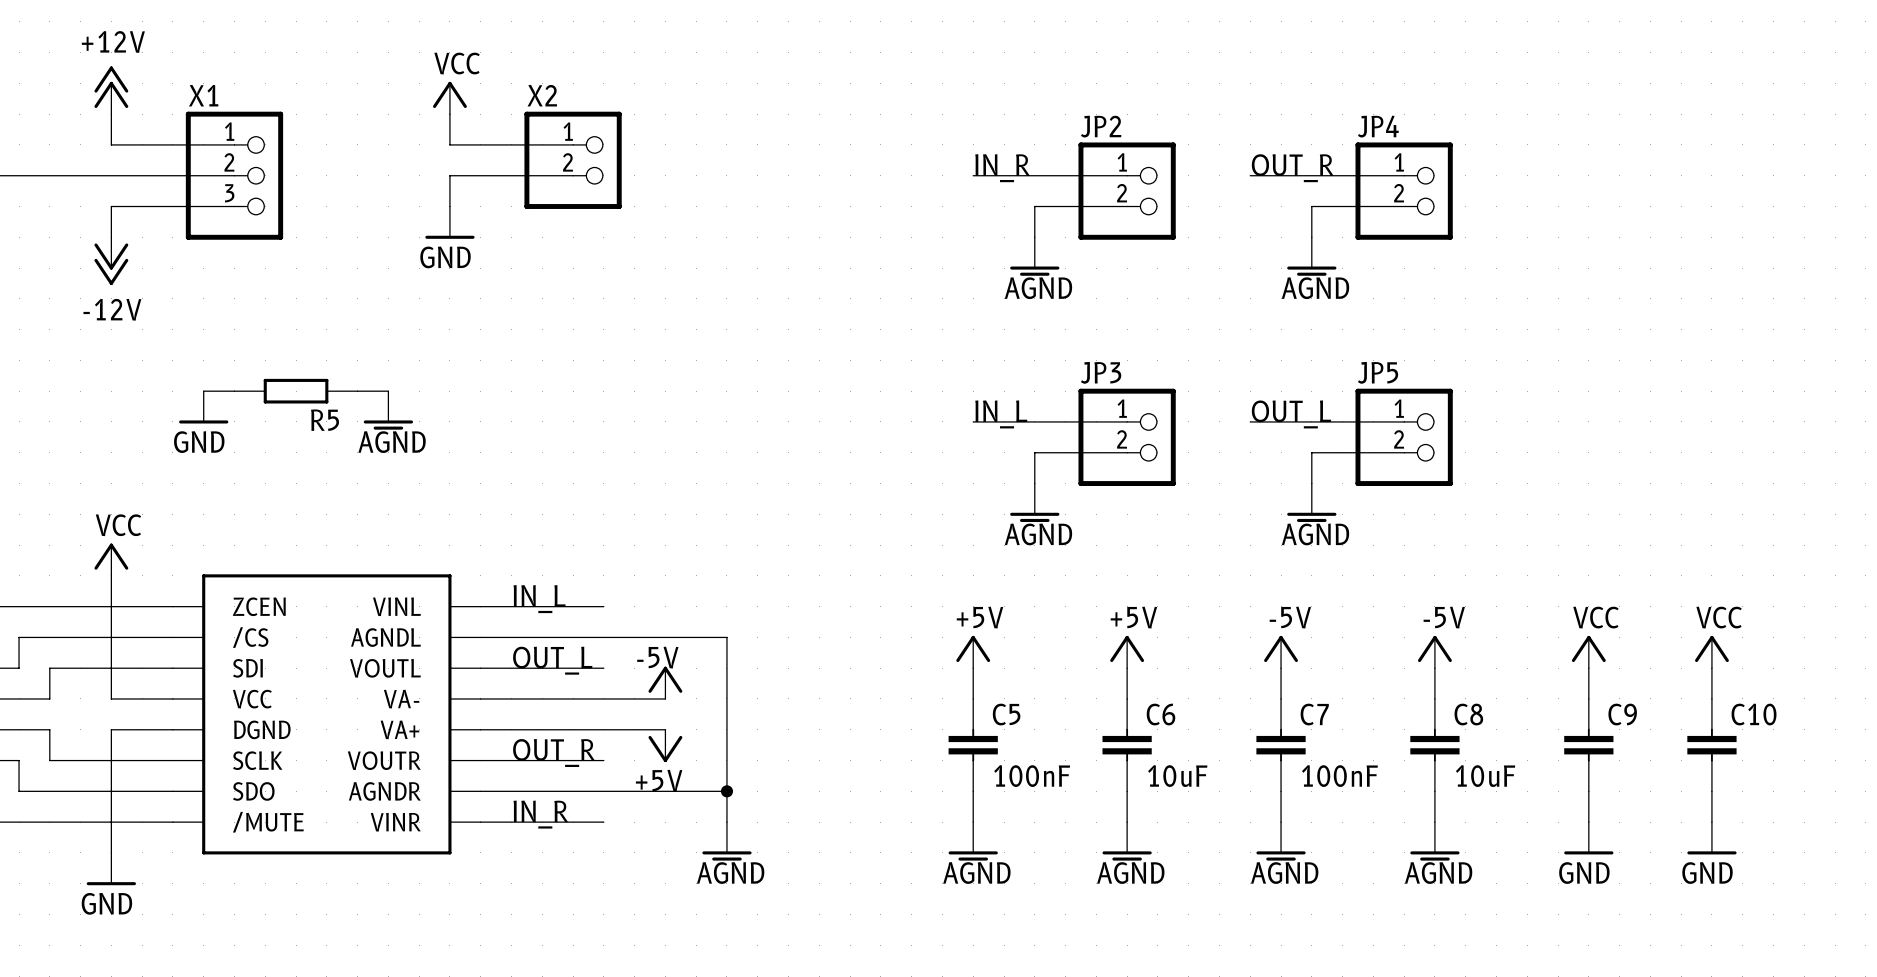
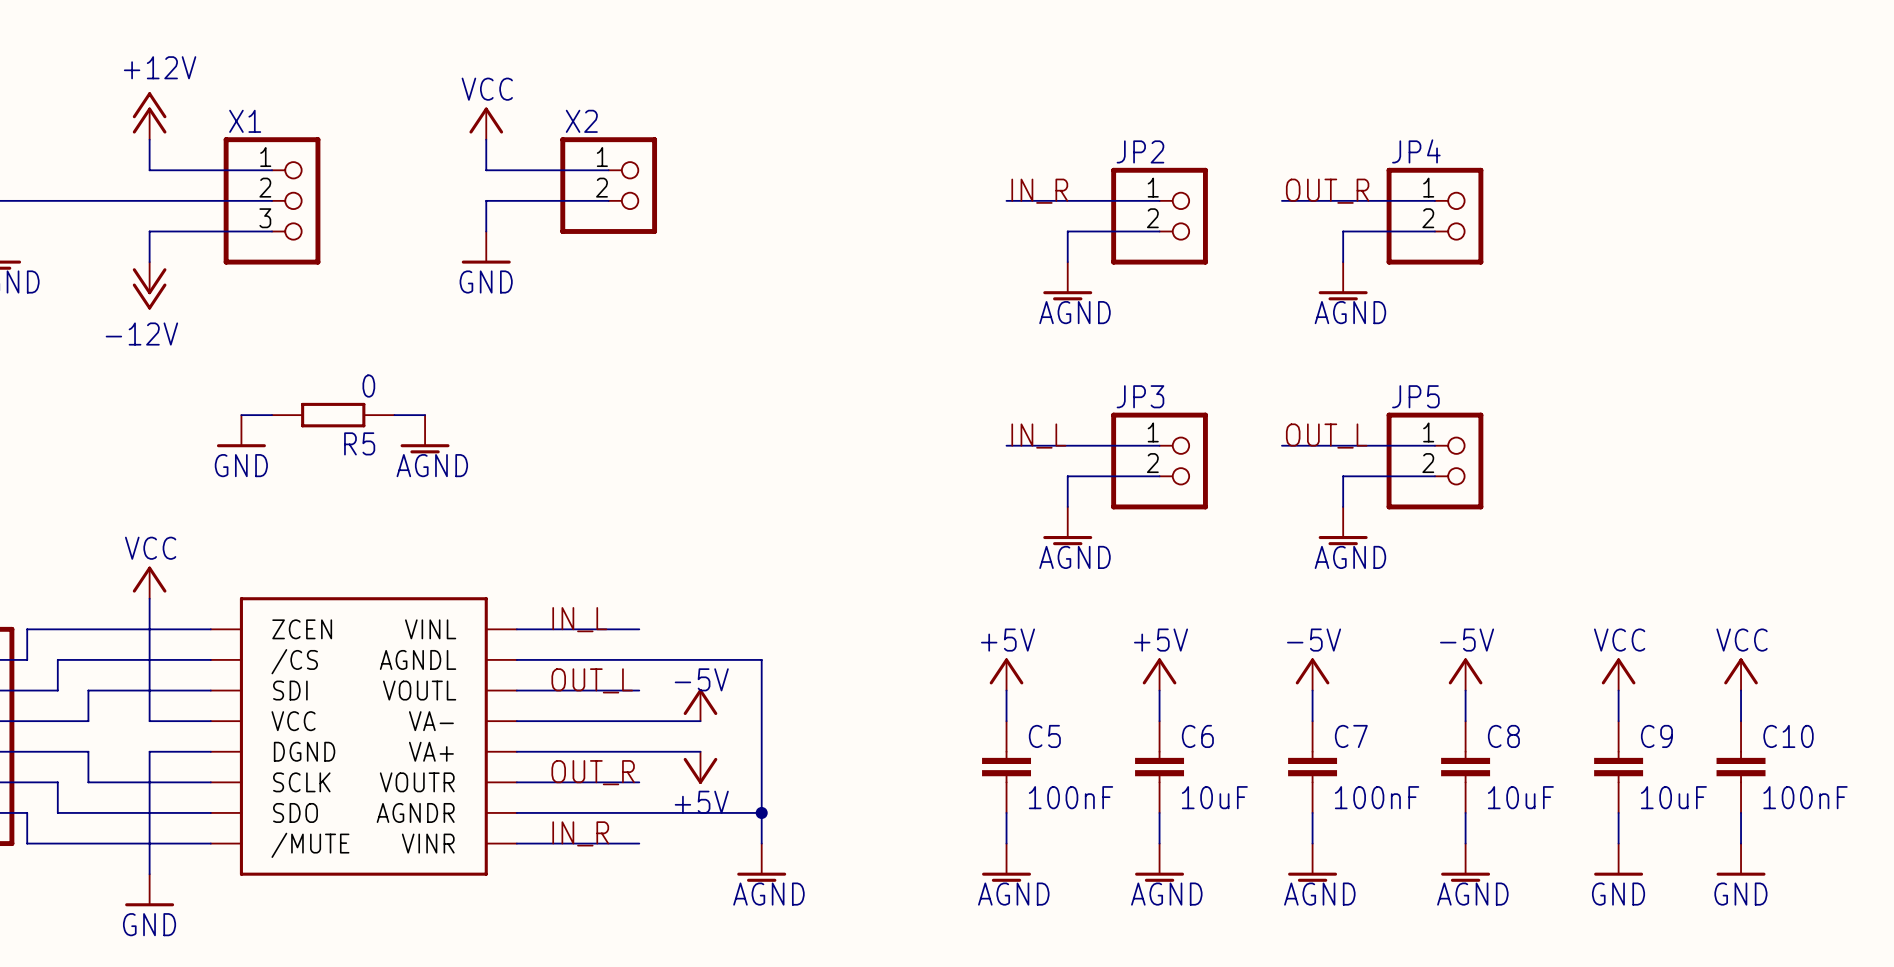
R5 value: none -> 0 (368, 386)
C9 value: none -> 10uF (1673, 797)
C10 value: none -> 100nF (1805, 797)

